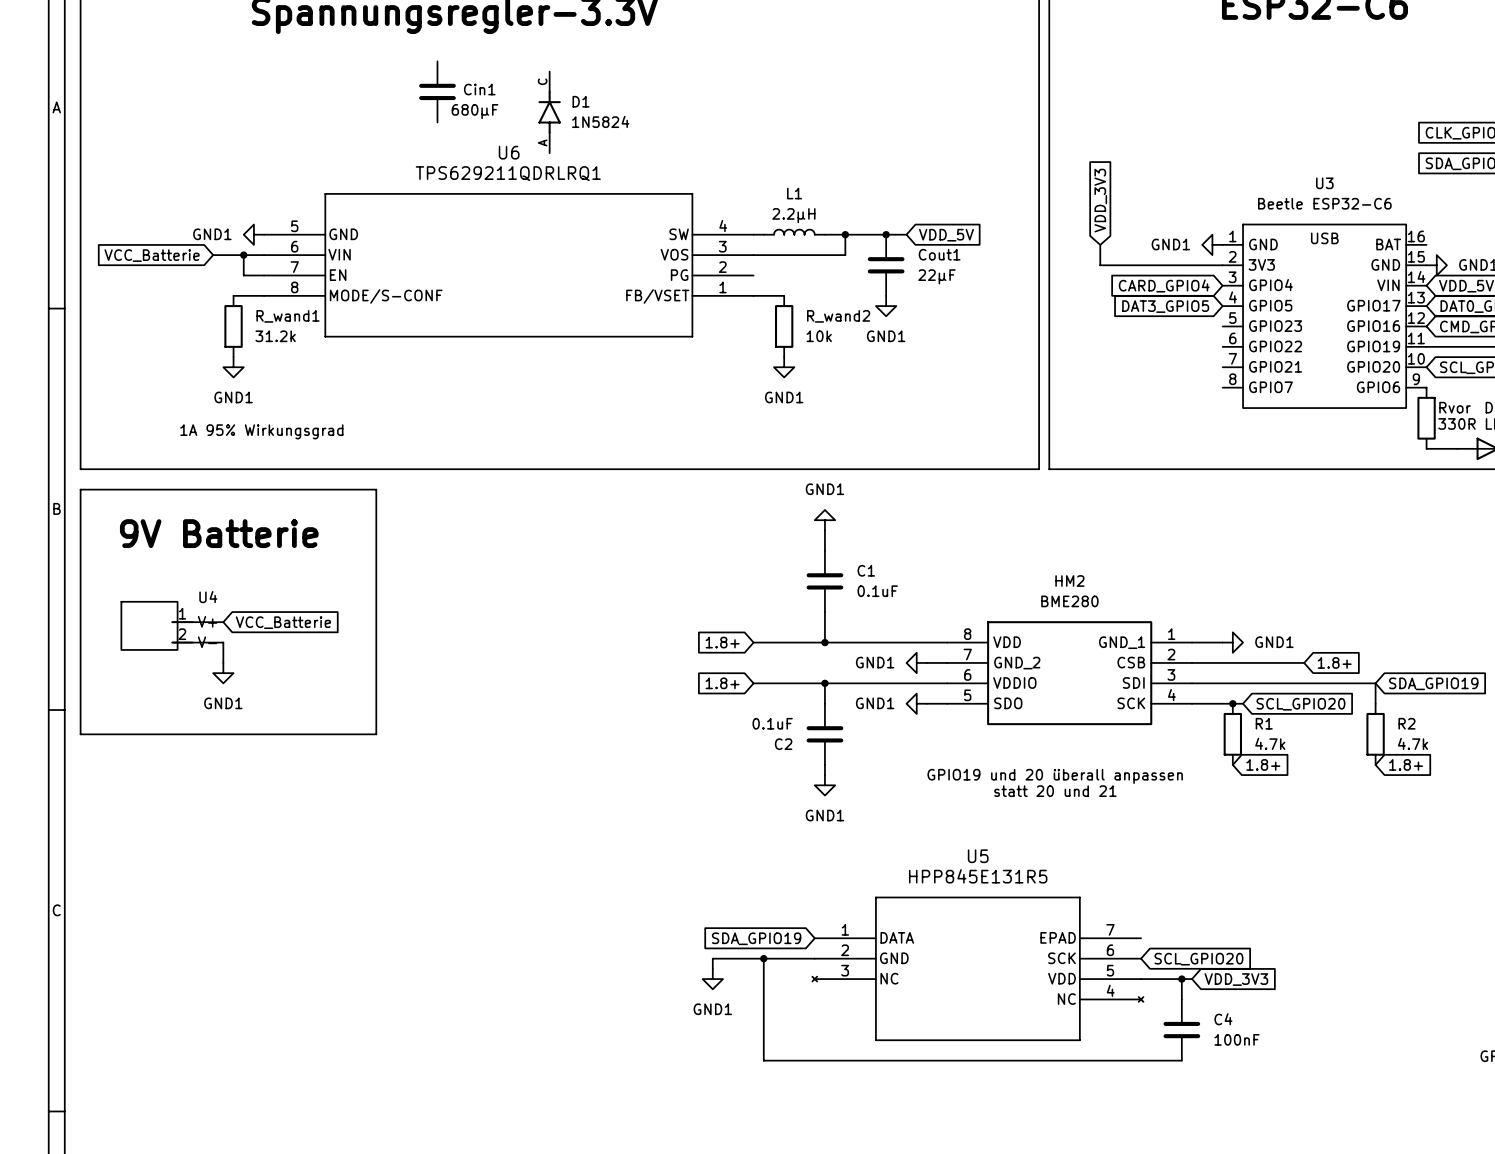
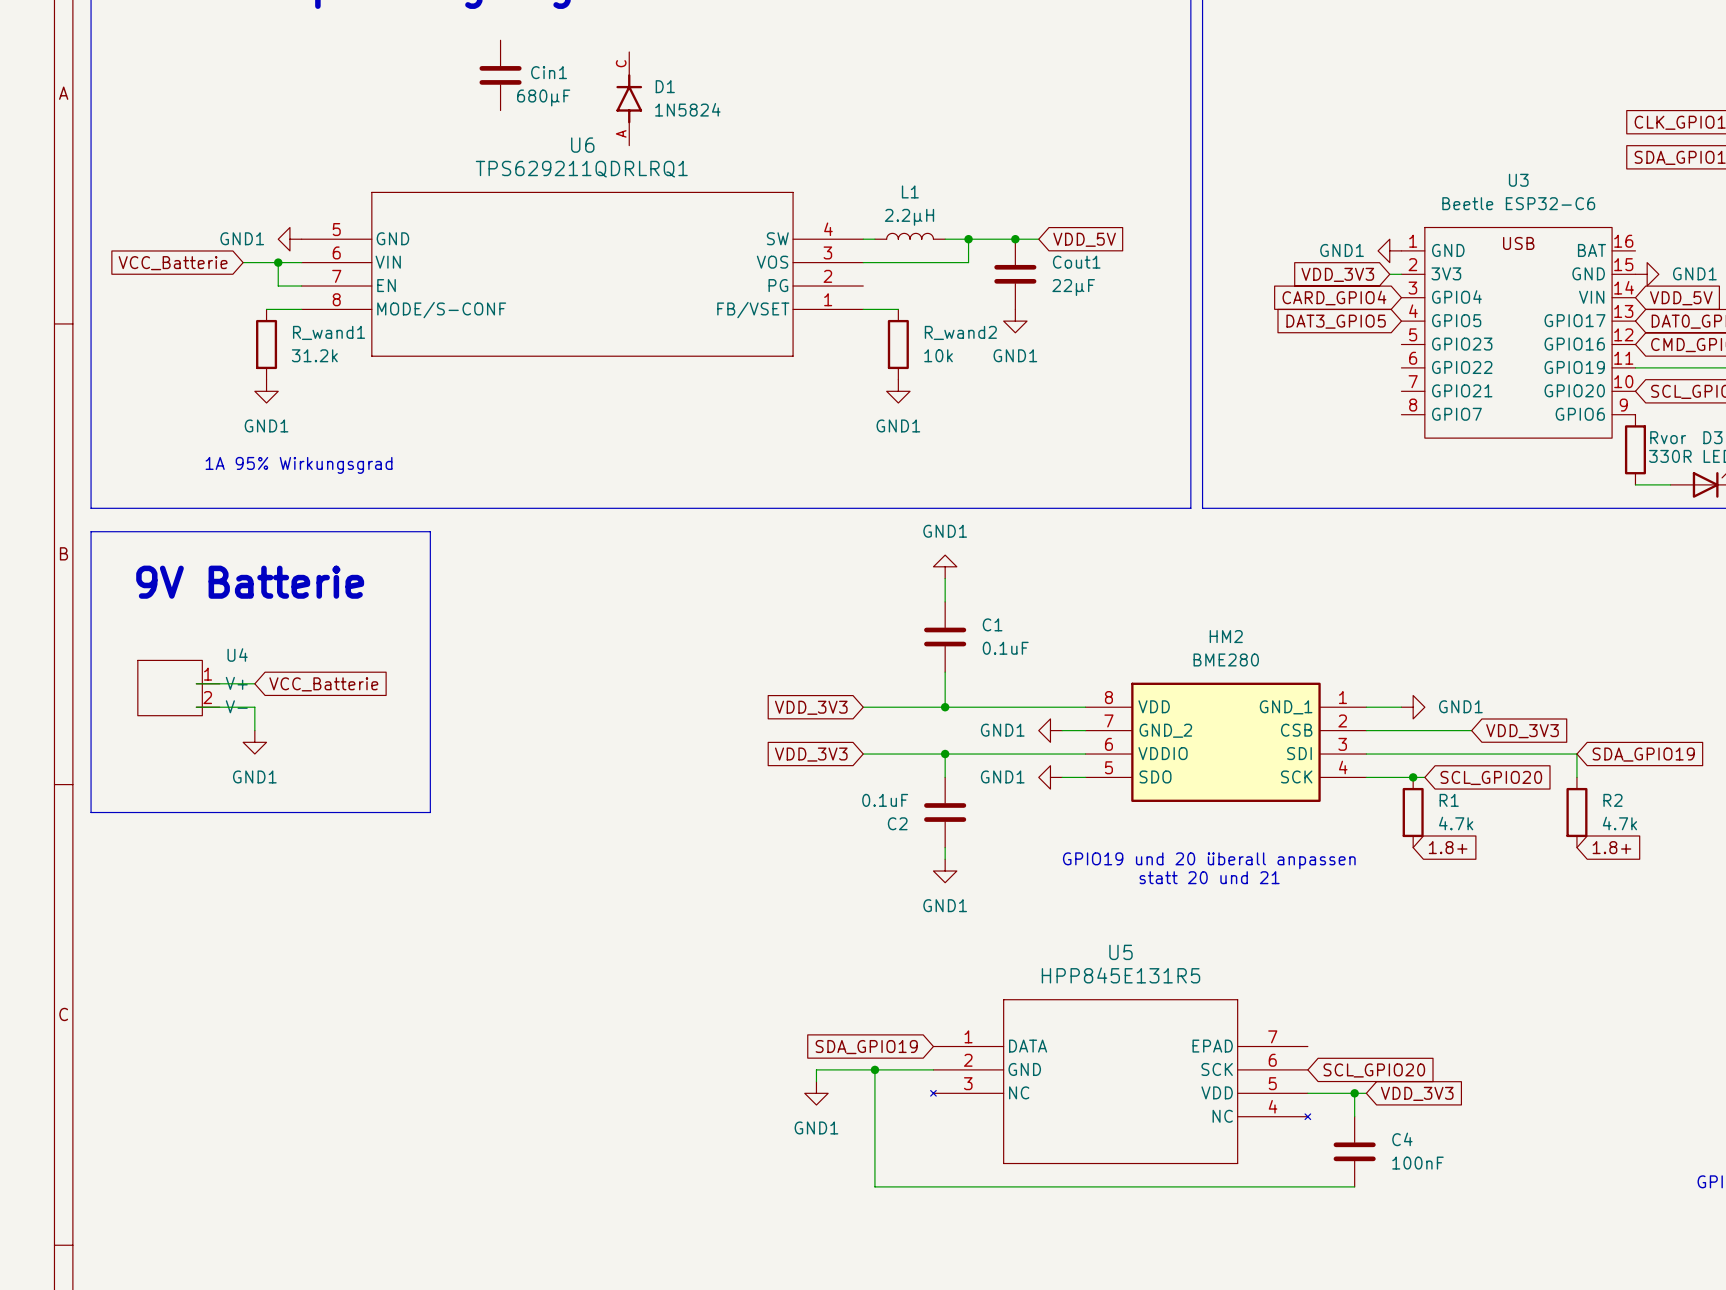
global label rotation: 0° (1100, 200) -> 90° counterclockwise (1337, 274)
wire: (1100, 244) (1100, 265) (1212, 265) -> none
global label: 1.8+ (722, 642) -> VDD_3V3 (811, 707)
wire: (1283, 662) (1304, 662) -> none
global label: 1.8+ (1334, 662) -> none
global label: none -> VDD_3V3 (1522, 731)
global label: 1.8+ (722, 683) -> VDD_3V3 (811, 754)

